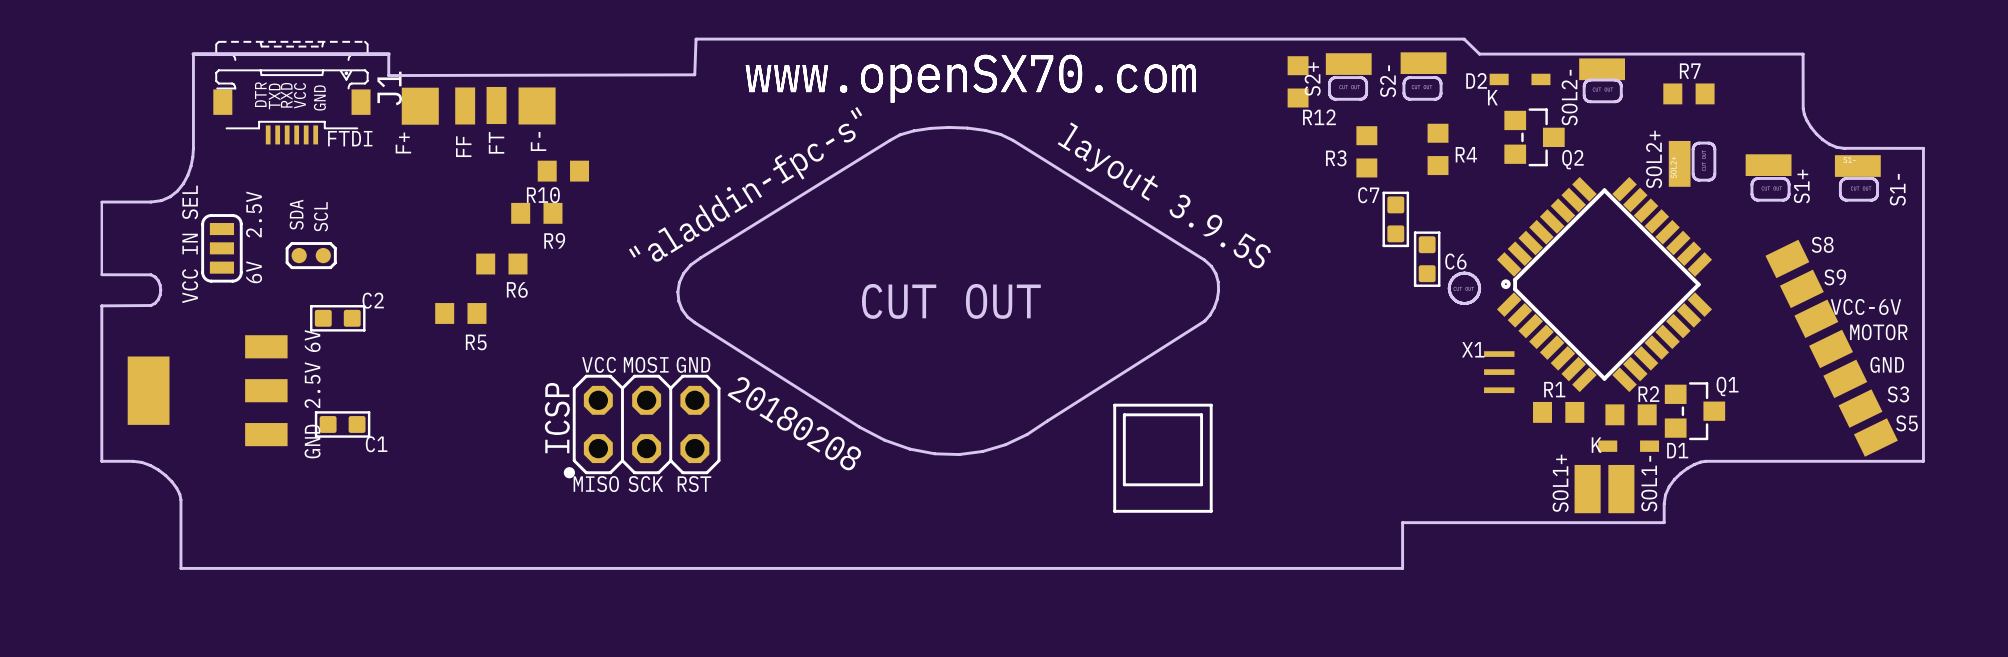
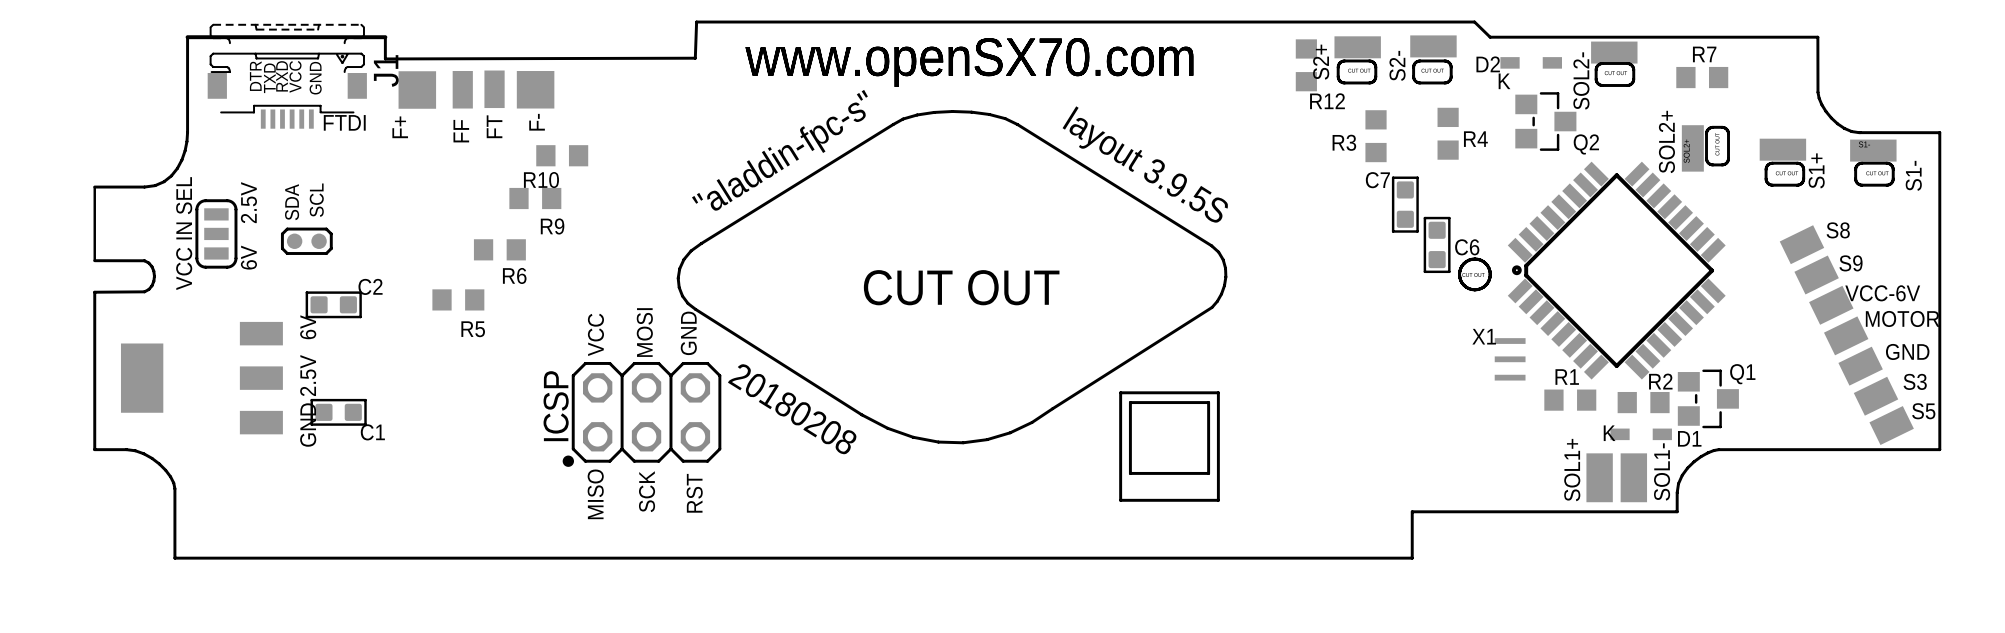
text rotation: 0° (599, 364) -> 90° counterclockwise (595, 334)
text rotation: 0° (646, 364) -> 90° counterclockwise (644, 332)
text rotation: 0° (693, 364) -> 90° counterclockwise (688, 333)
text rotation: 0° (596, 484) -> 90° counterclockwise (595, 494)
text rotation: 0° (645, 484) -> 90° counterclockwise (647, 491)
text rotation: 0° (694, 484) -> 90° counterclockwise (694, 493)

